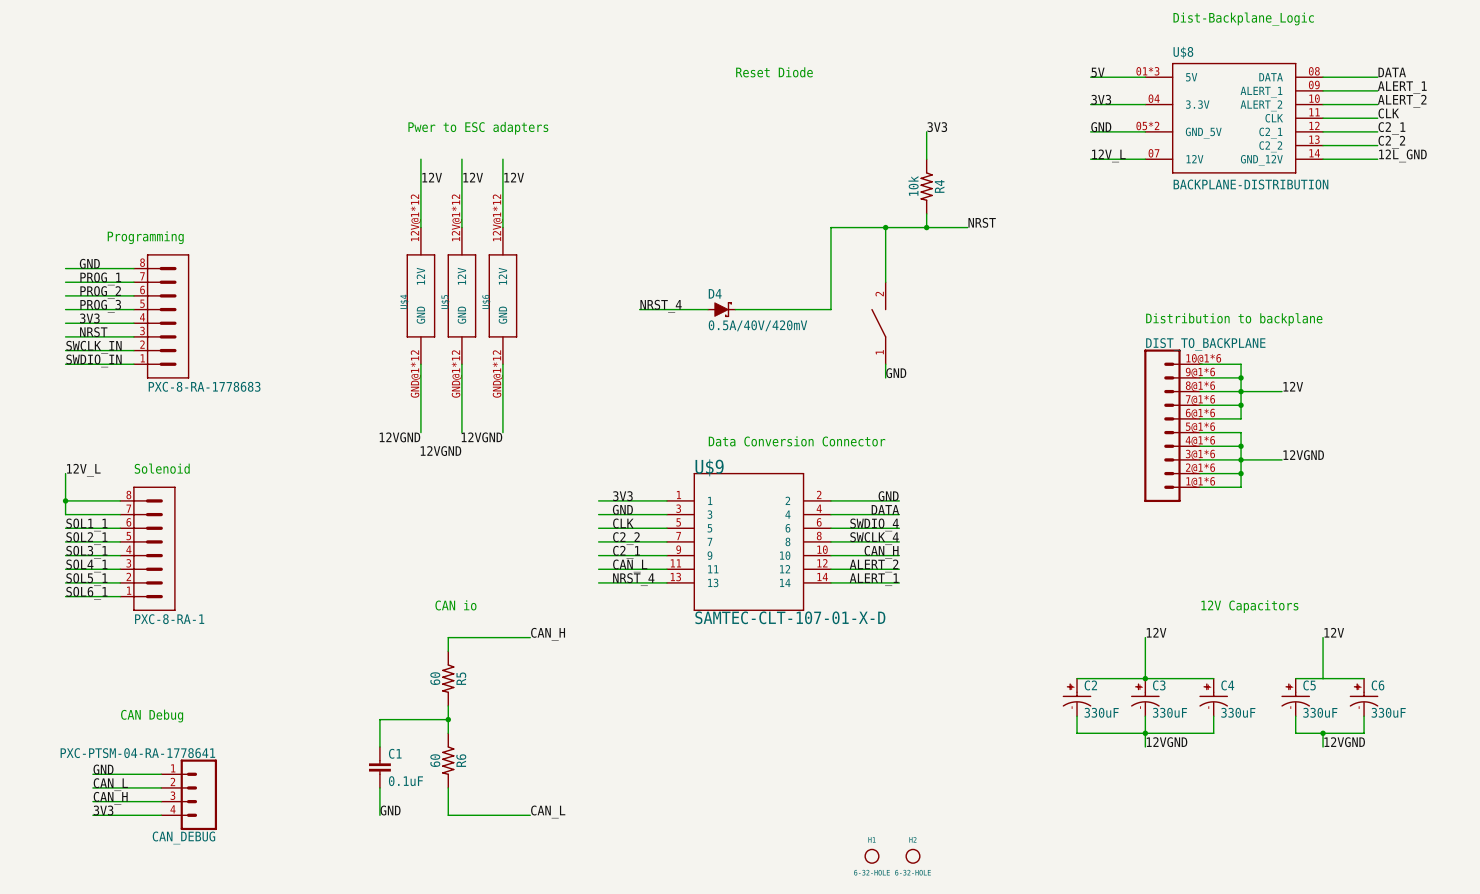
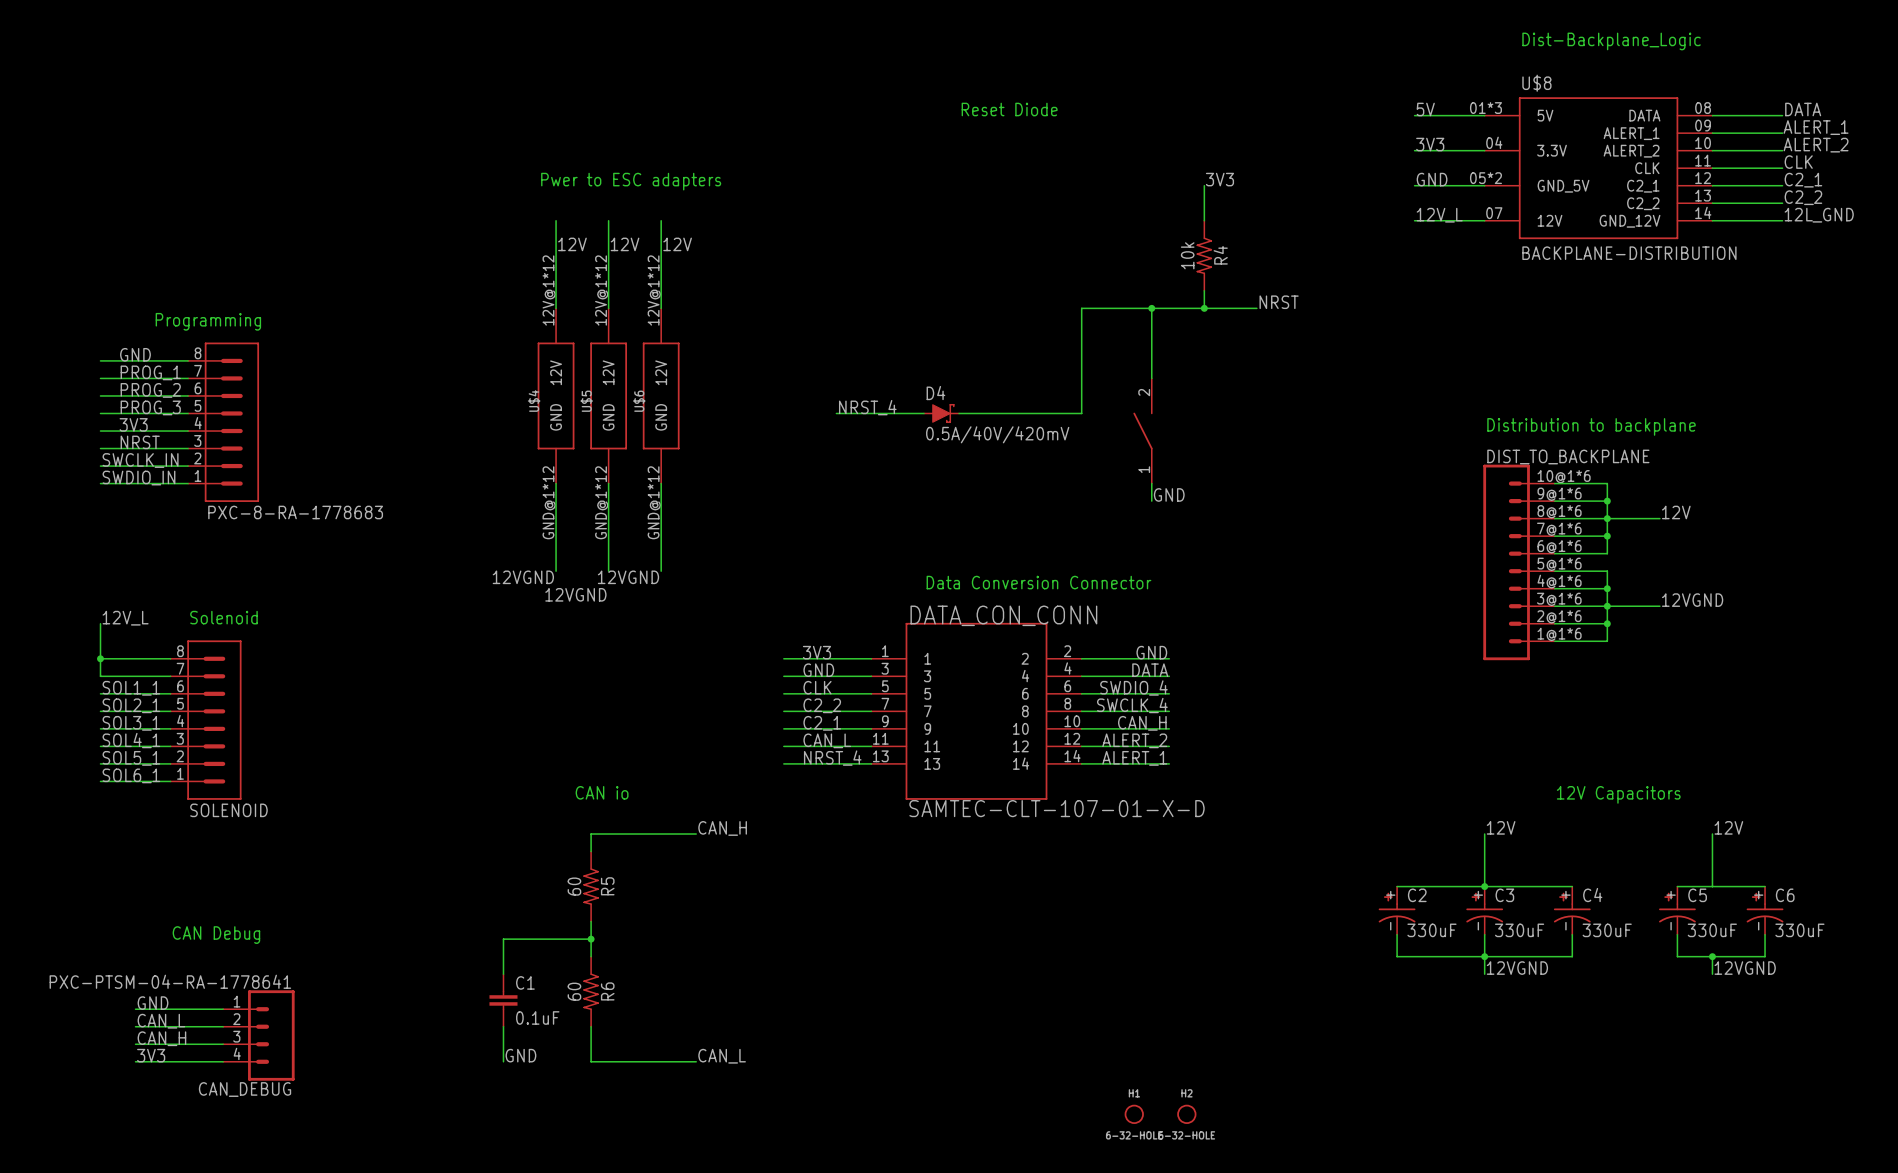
U$9 name: U$9 (709, 467) -> DATA_CON_CONN (1003, 615)
PXC-8-RA-1 name: PXC-8-RA-1 (169, 619) -> SOLENOID (228, 810)

